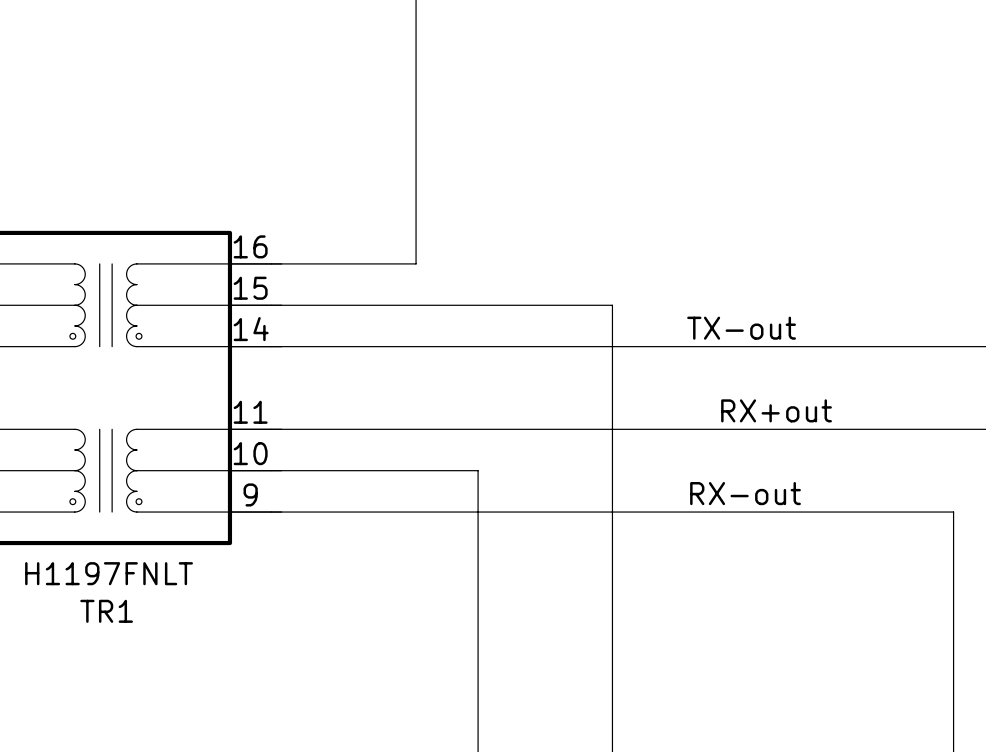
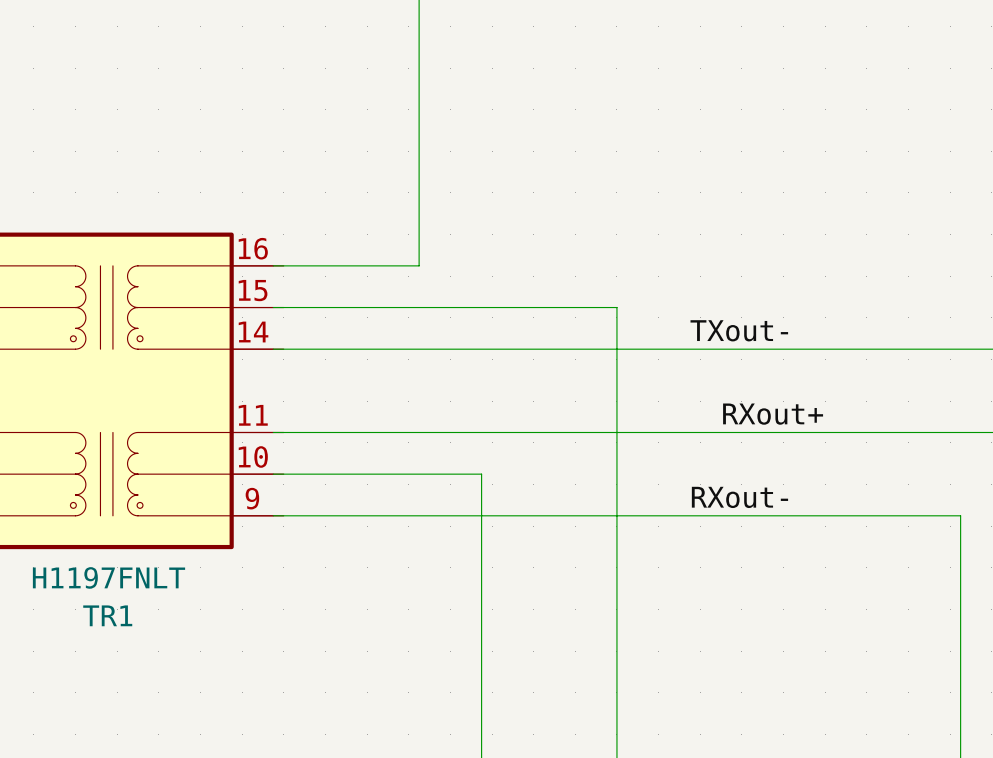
label: TX-out (741, 328) -> TXout- (739, 330)
label: RX+out (776, 410) -> RXout+ (773, 414)
label: RX-out (745, 493) -> RXout- (739, 497)

